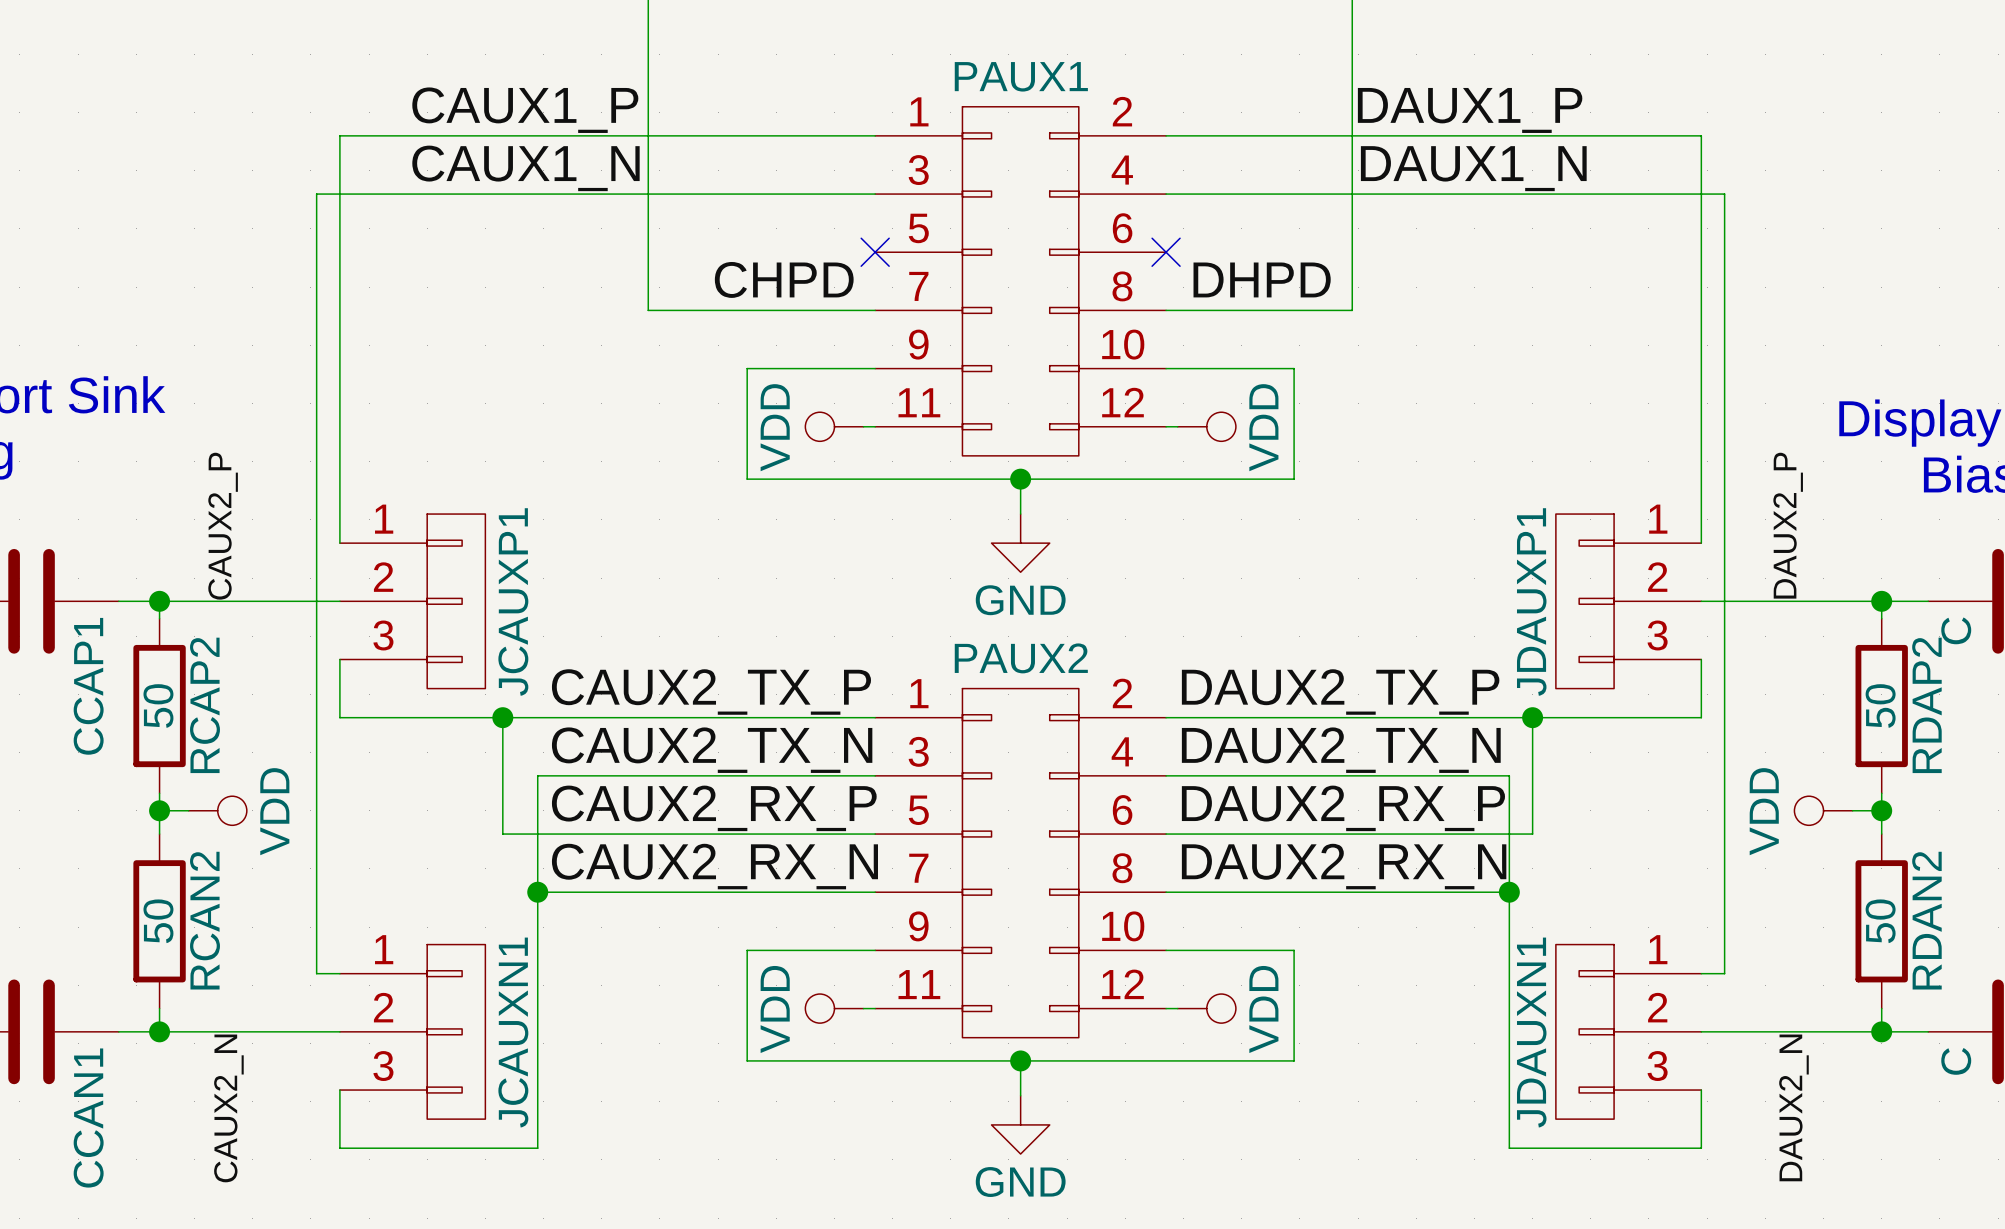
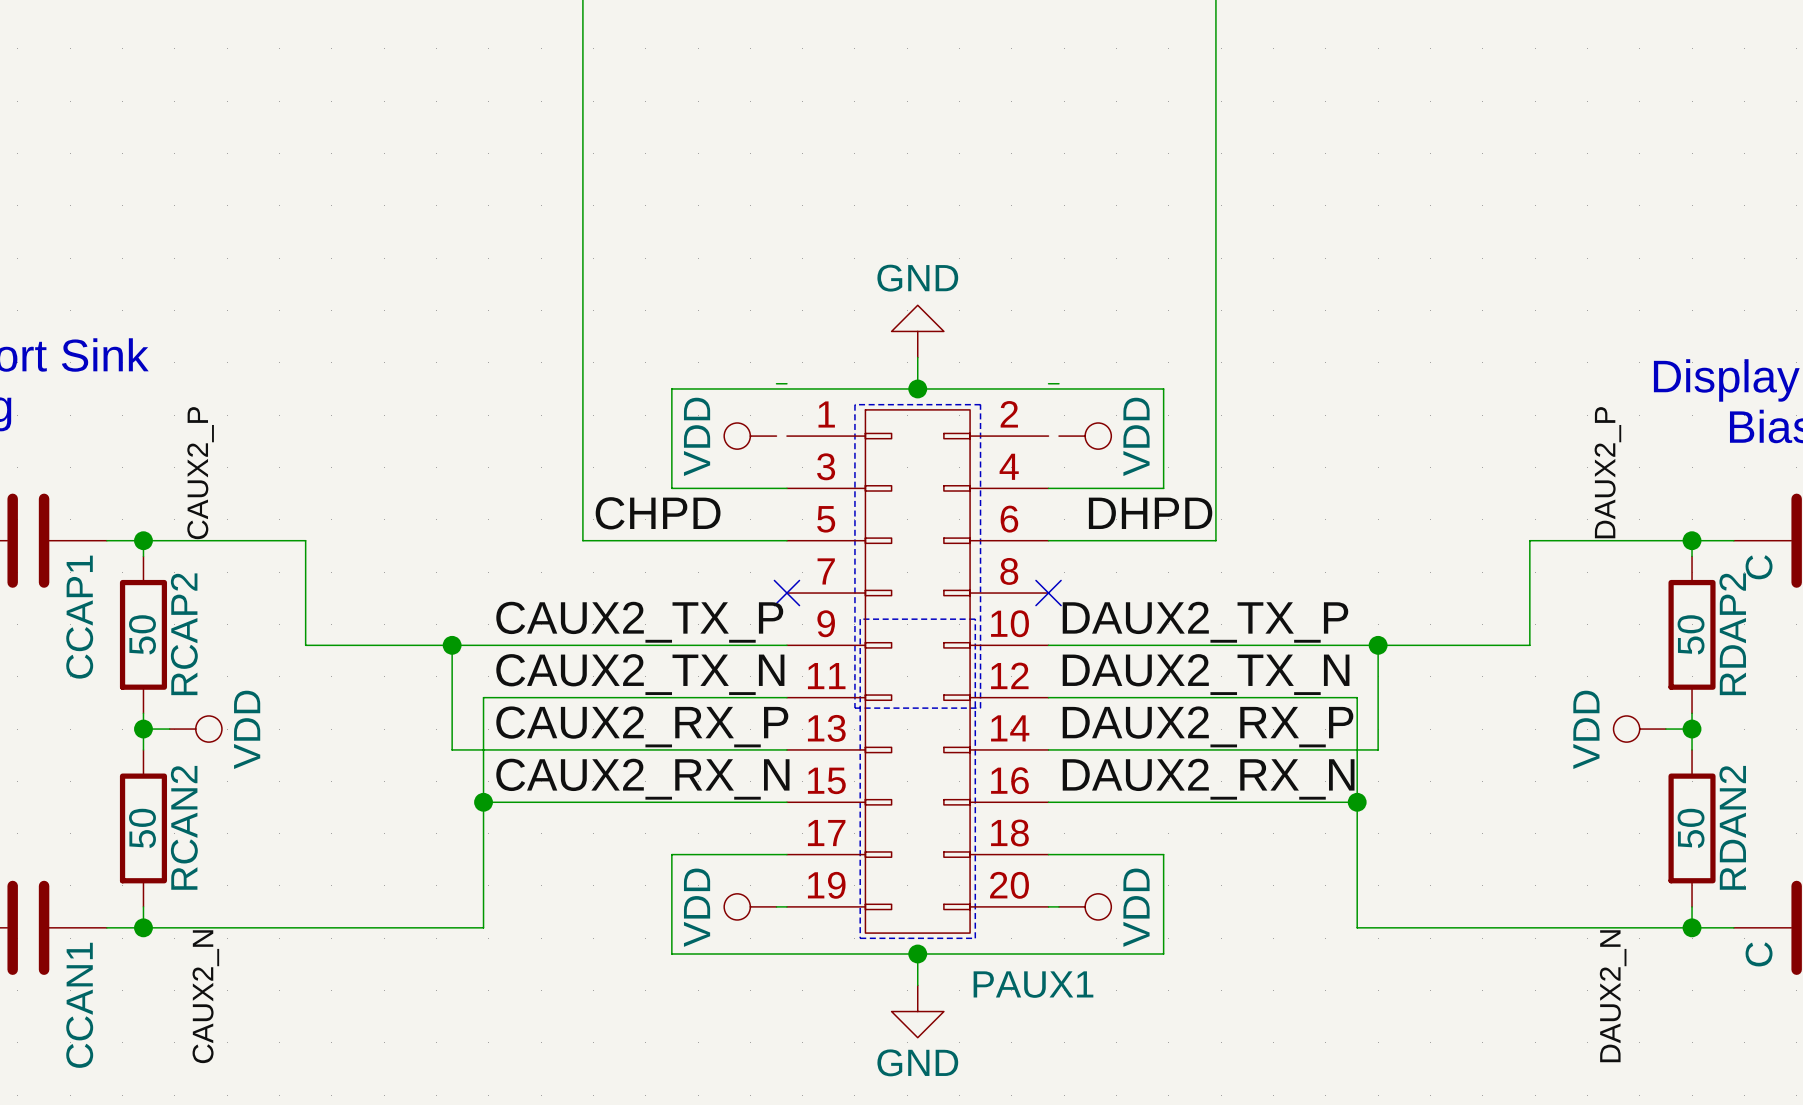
PAUX1 name position: PAUX1 (1021, 76) -> PAUX1 (1033, 984)
PAUX1 symbol: [875, 106, 1167, 456] -> [786, 409, 1049, 934]
label: CAUX1_P (525, 110) -> none
label: DAUX1_P (1470, 110) -> none
wire: (875, 135) (339, 135) (339, 543) -> none
wire: (1166, 135) (1701, 135) (1701, 543) -> none
label: CAUX1_N (525, 168) -> none
label: DAUX1_N (1473, 168) -> none
wire: (875, 194) (316, 194) (316, 973) (339, 973) -> none
wire: (1166, 194) (1724, 194) (1724, 973) (1701, 973) -> none
no-connect mark: (875, 252) -> none
no-connect mark: (1166, 252) -> none
label position: CHPD (784, 279) -> CHPD (658, 513)
label position: DHPD (1262, 279) -> DHPD (1150, 513)
wire: (648, 310) (875, 310) -> (582, 279) (582, 540) (786, 540)
wire: (1166, 310) (1352, 310) -> (1048, 540) (1215, 540) (1215, 279)
wire: (875, 368) (747, 368) (747, 432) -> none
wire: (1166, 368) (1294, 368) (1294, 432) -> (671, 388) (1163, 388)
power symbol position: VDD (834, 426) -> VDD (750, 436)
power symbol position: VDD (1206, 426) -> VDD (1085, 436)
line: none -> (854, 404) (854, 708) (980, 708) (980, 404) (854, 404)
wire: (747, 479) (1294, 479) -> (1048, 488) (1163, 488) (1163, 430)
wire: none -> (671, 430) (671, 488) (786, 488)
wire: (1020, 479) (1020, 514) -> (917, 357) (917, 388)
junction position: (1020, 479) -> (917, 388)
power symbol rotation: 0° (1020, 543) -> 180° (917, 331)
power symbol position: GND (1020, 543) -> GND (917, 331)
wire: none -> (305, 540) (305, 593)
JCAUXP1: (412, 601) -> none
JDAUXP1: (1628, 601) -> none
wire: none -> (1529, 540) (1529, 593)
no-connect mark: none -> (786, 593)
no-connect mark: none -> (1048, 593)
line: none -> (860, 619) (975, 619) (975, 938) (860, 938) (860, 619)
PAUX2: (1020, 863) -> none
JCAUXN1: (412, 1031) -> none
wire: (537, 1031) (537, 1148) (339, 1148) (339, 1090) -> (483, 927) (305, 927)
wire: (1509, 1031) (1509, 1148) (1701, 1148) (1701, 1090) -> (1357, 927) (1529, 927)
JDAUXN1: (1628, 1031) -> none

